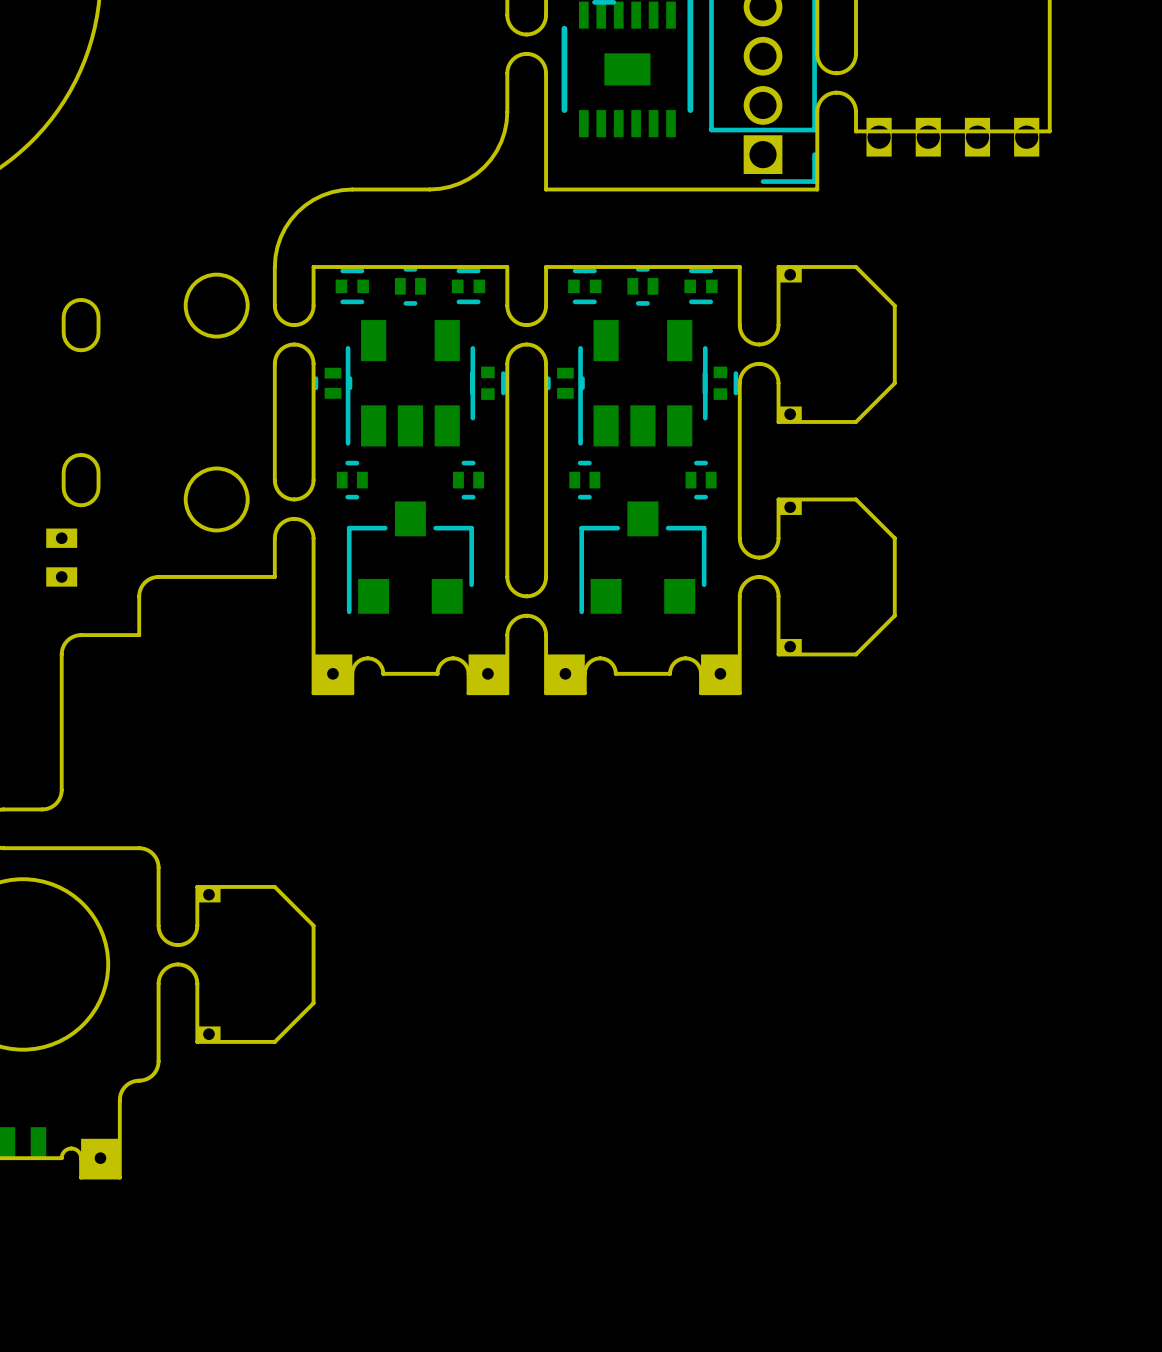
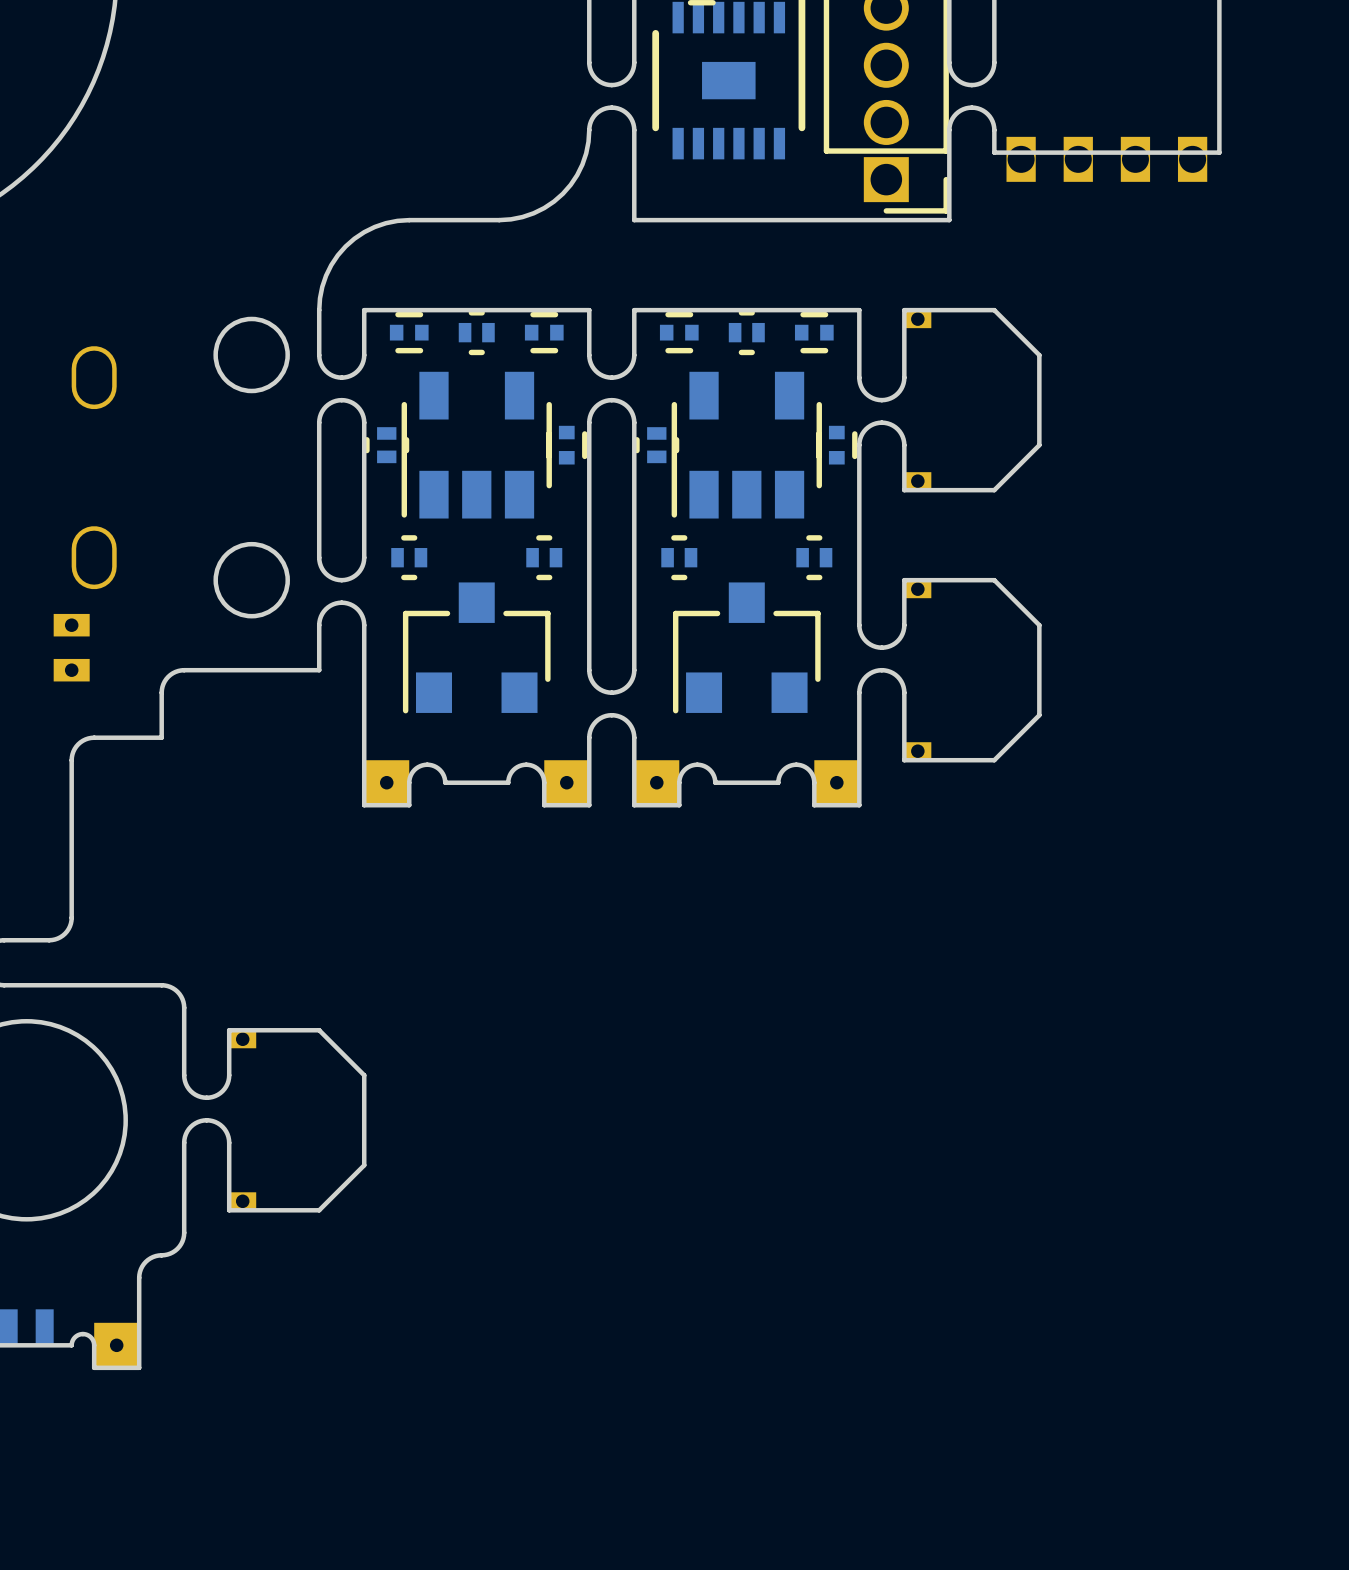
board edge: (546, 15) (540, 28) (526, 34) (512, 28) (507, 15) -> (634, 17) (633, 68) (625, 80) (611, 85) (598, 80) (590, 68) (589, 17)
board edge: (546, 112) (545, 68) (538, 57) (526, 53) (514, 57) (507, 68) (507, 112) -> (634, 130) (632, 121) (627, 114) (620, 109) (611, 107) (603, 109) (595, 114) (590, 121) (589, 130)

